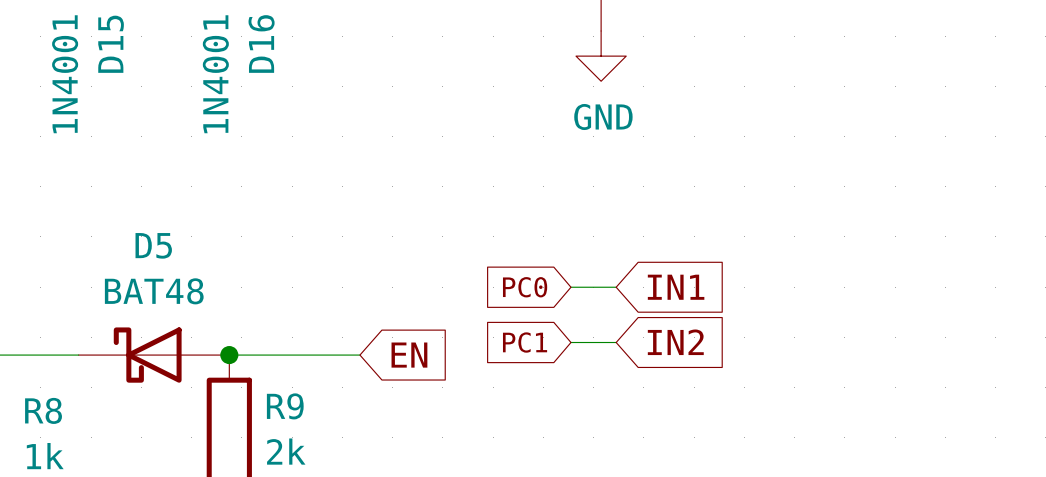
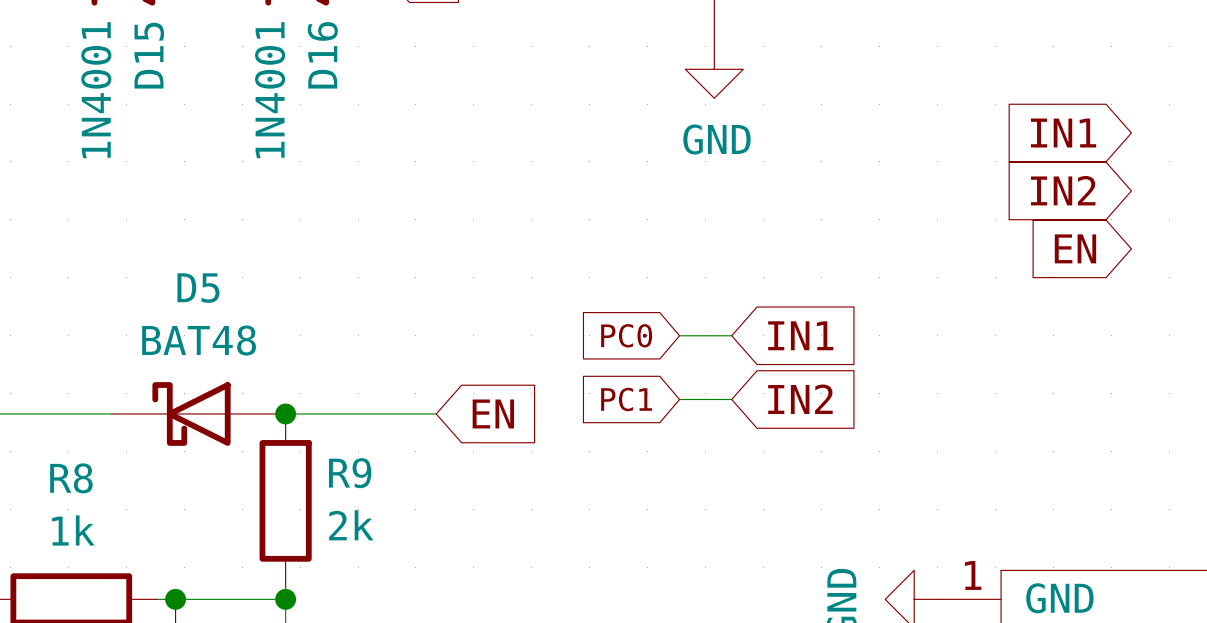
global label: none -> IN1 (1063, 133)
global label: none -> IN2 (1063, 190)
global label: none -> EN (1075, 248)

